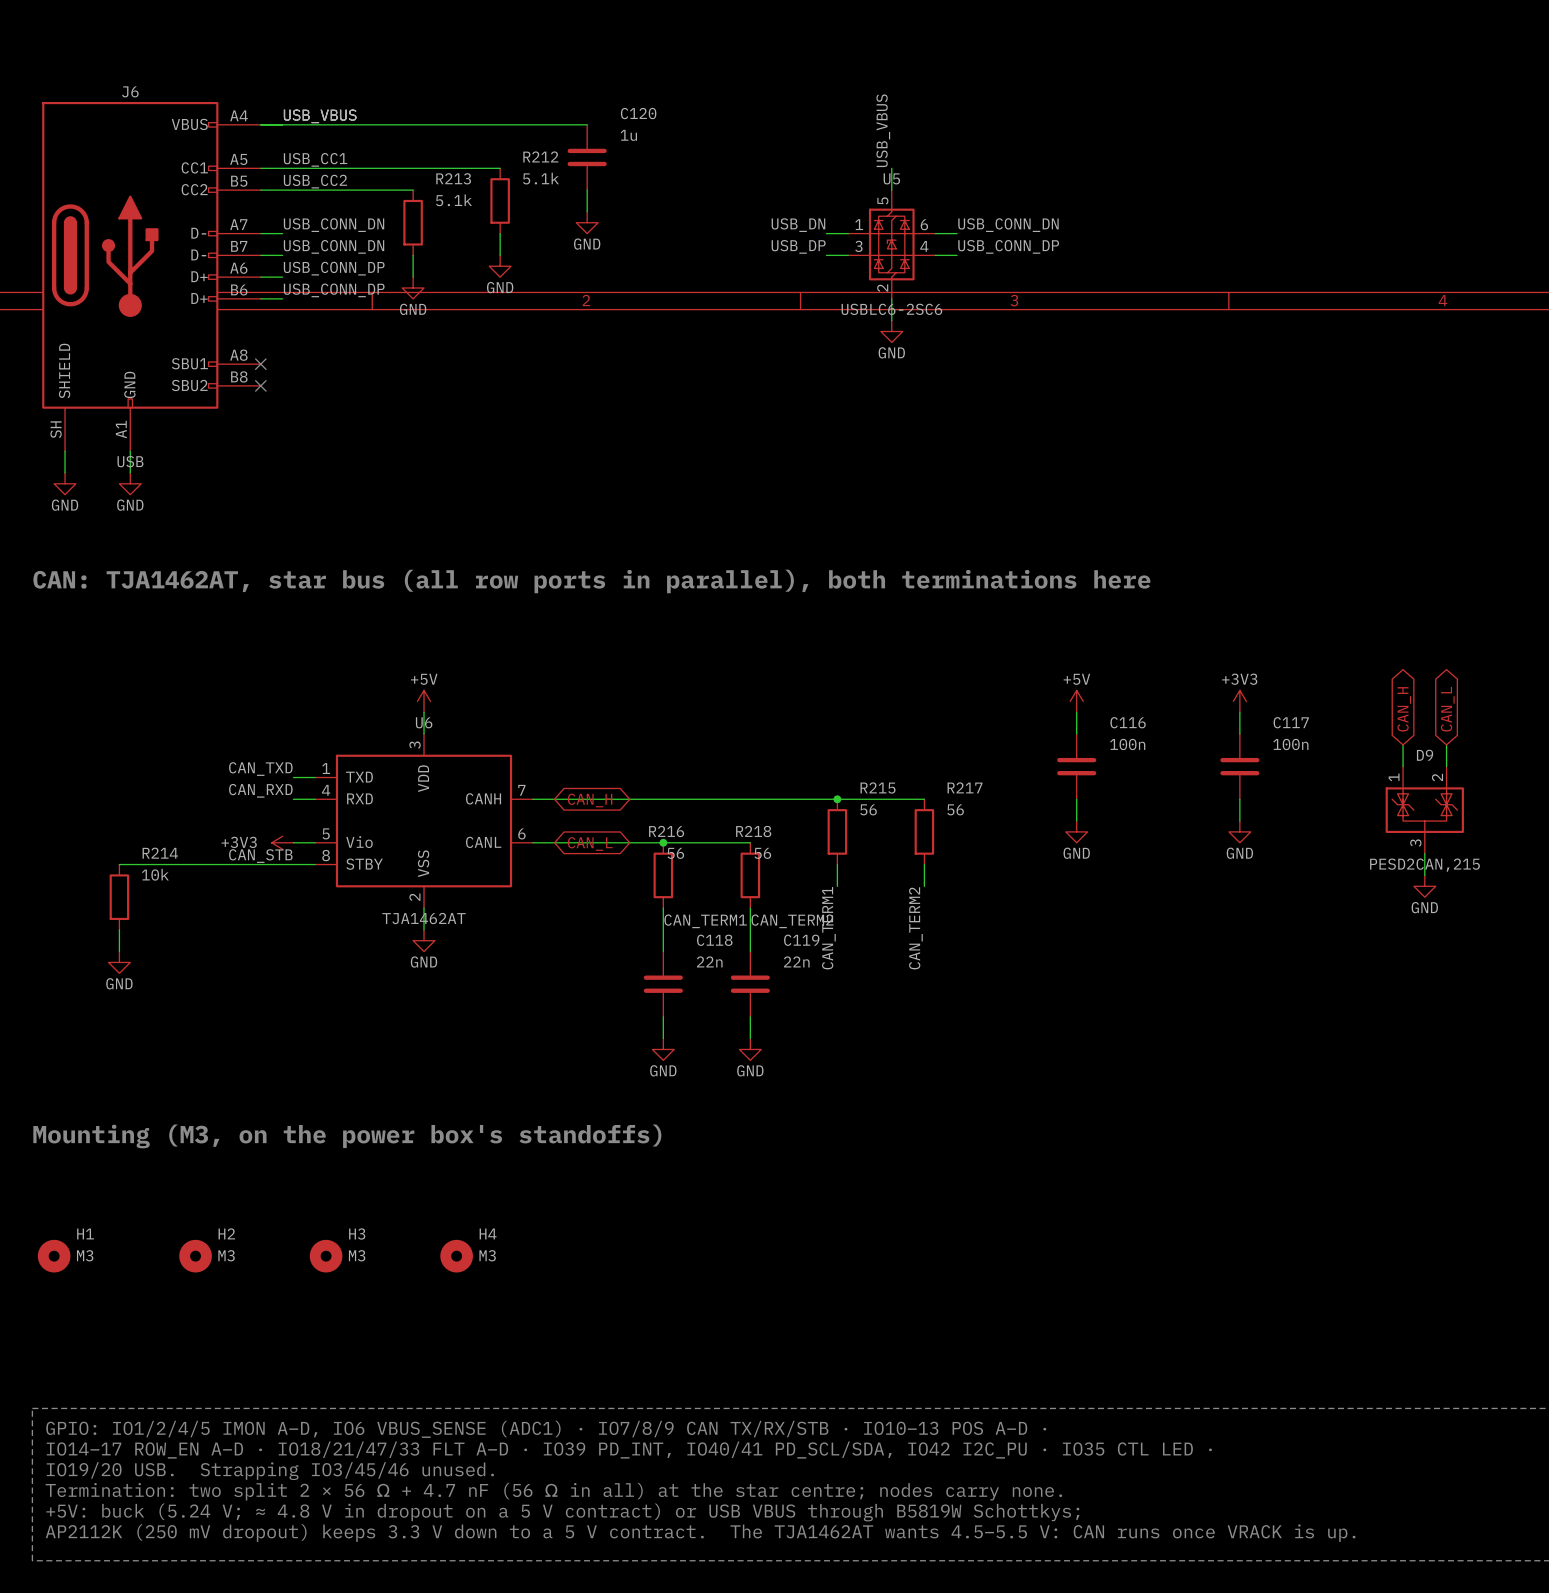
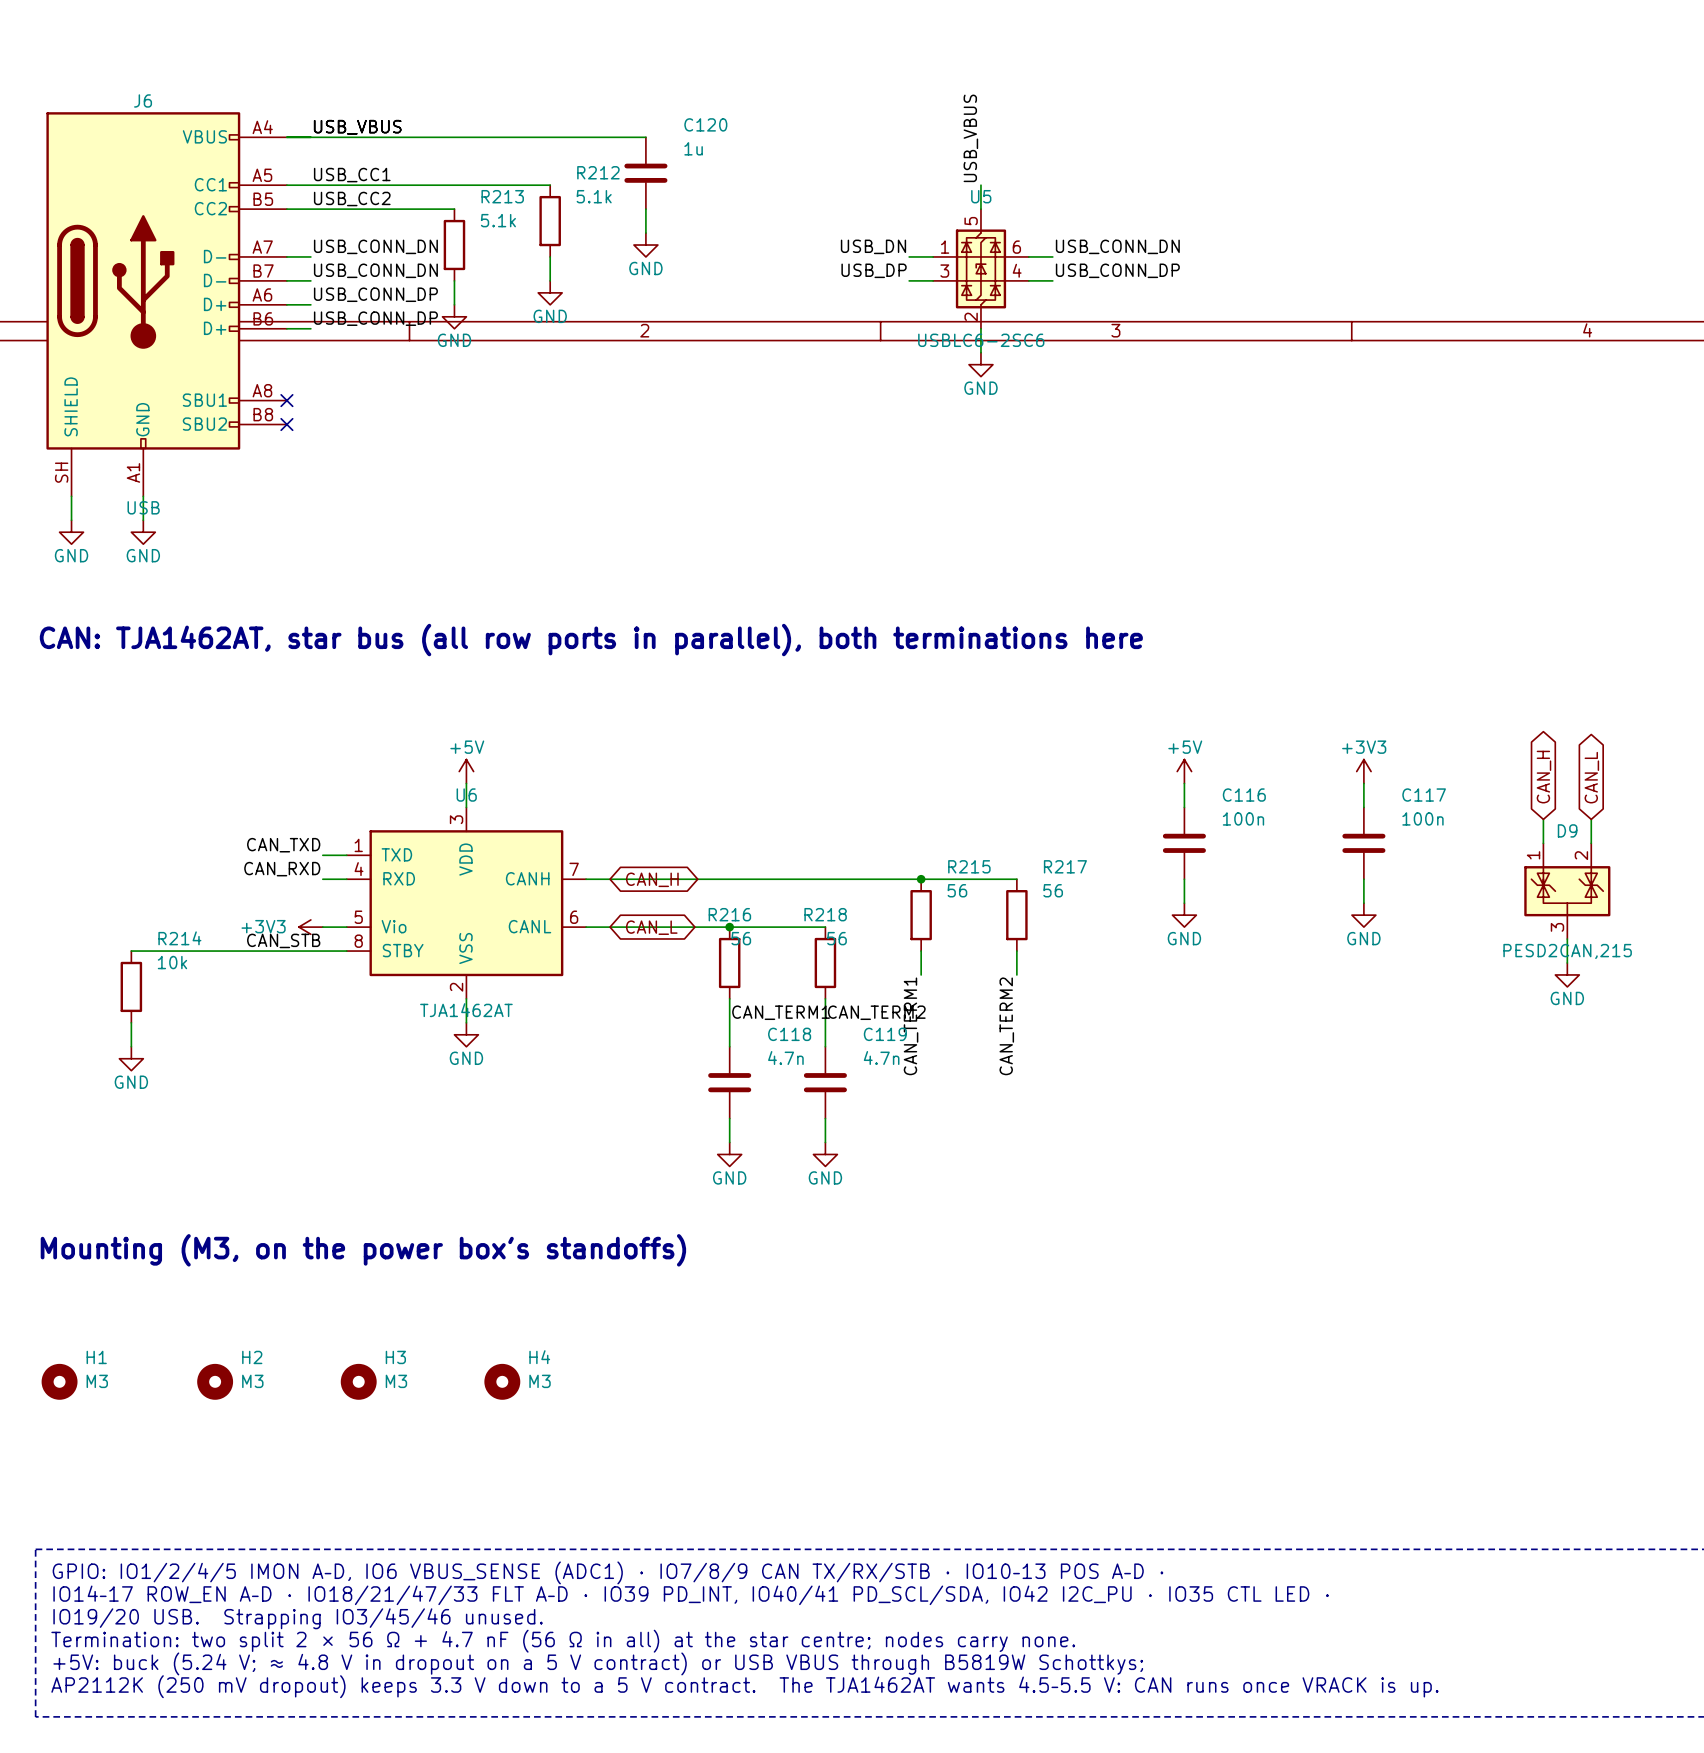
C118 value: 22n (709, 961) -> 4.7n (785, 1058)
C119 value: 22n (796, 961) -> 4.7n (881, 1058)

